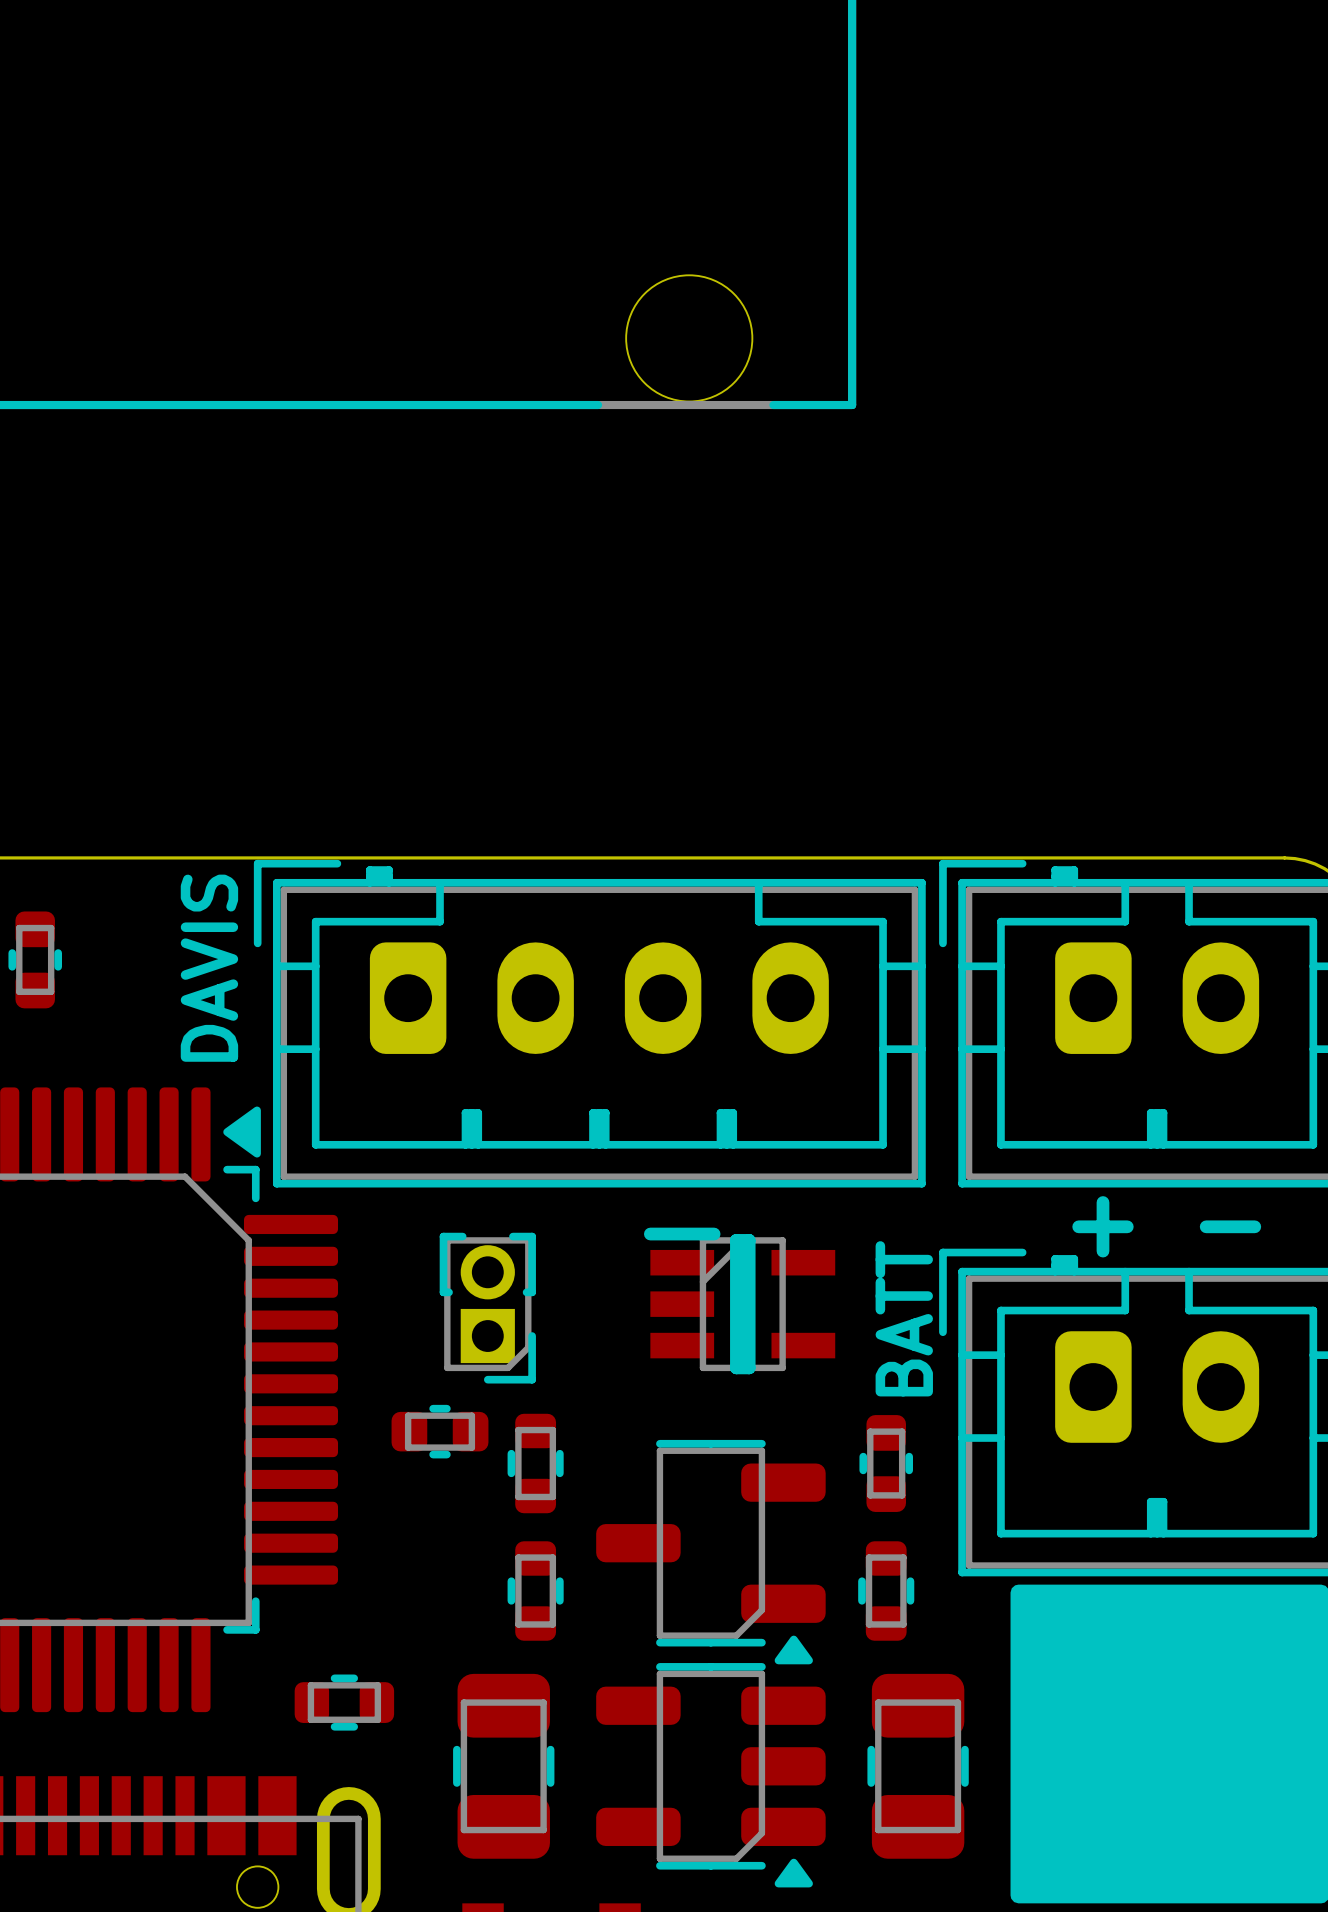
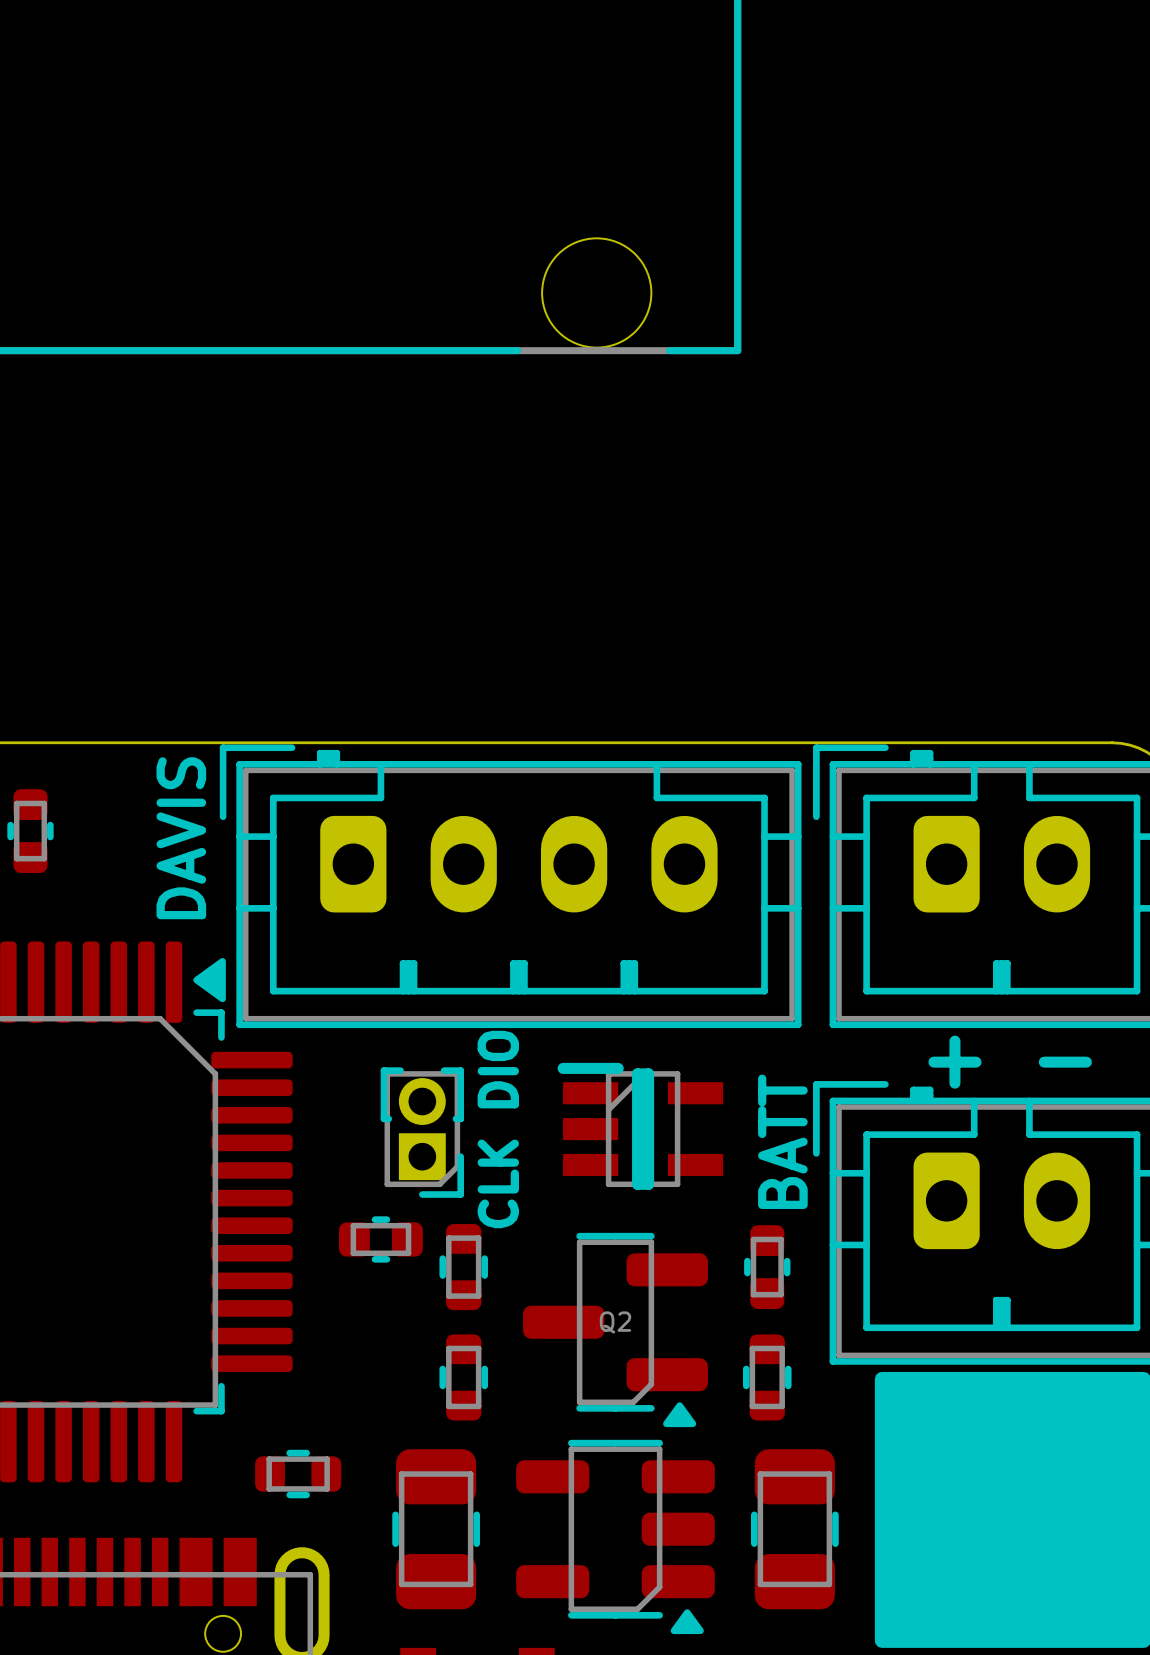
text: none -> CLK DIO (498, 1129)
Q2: none -> (615, 1329)
part: (710, 1552) -> none

